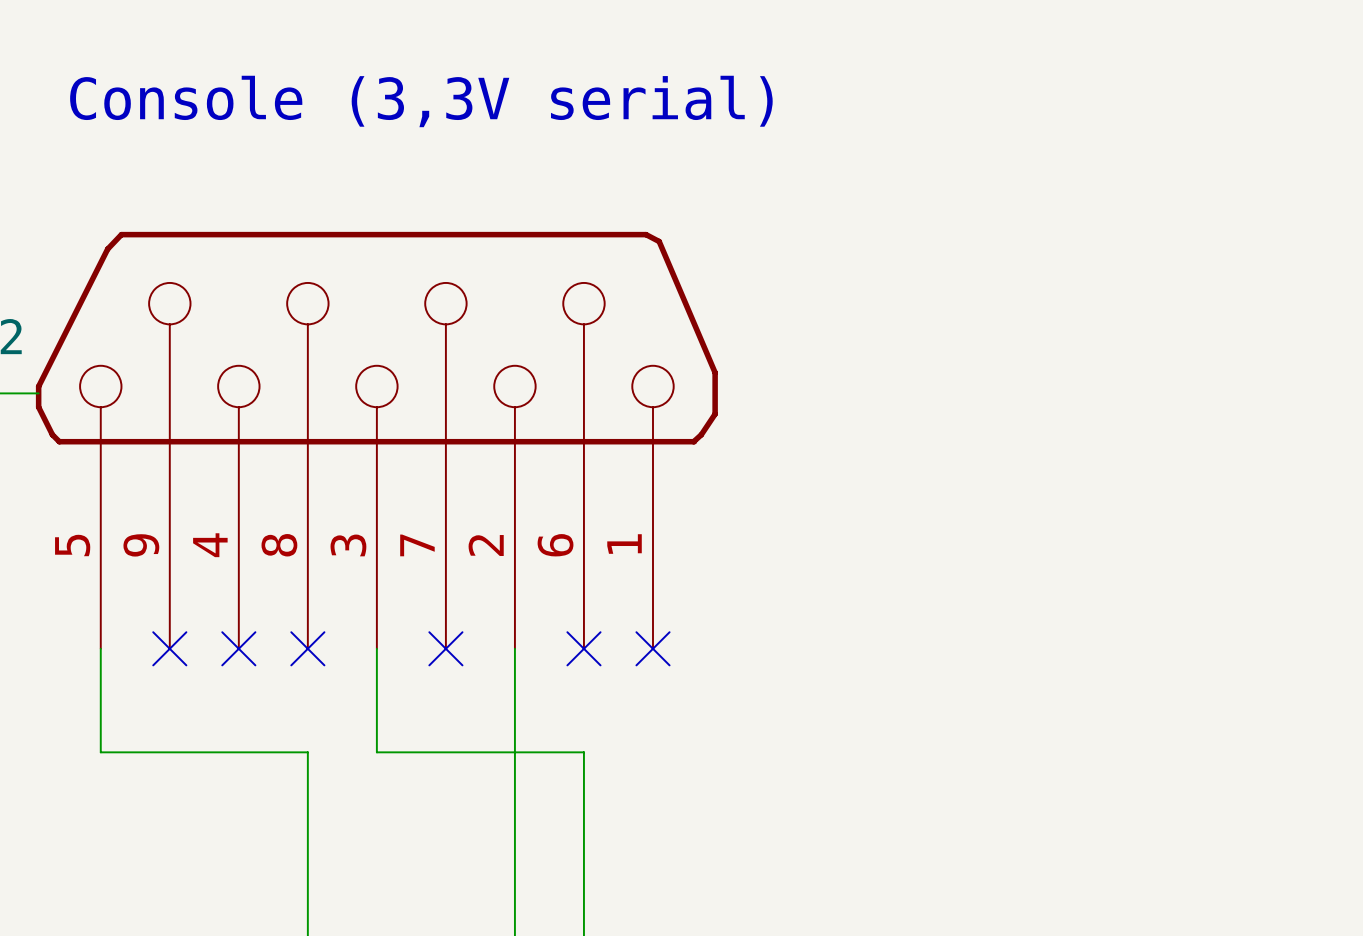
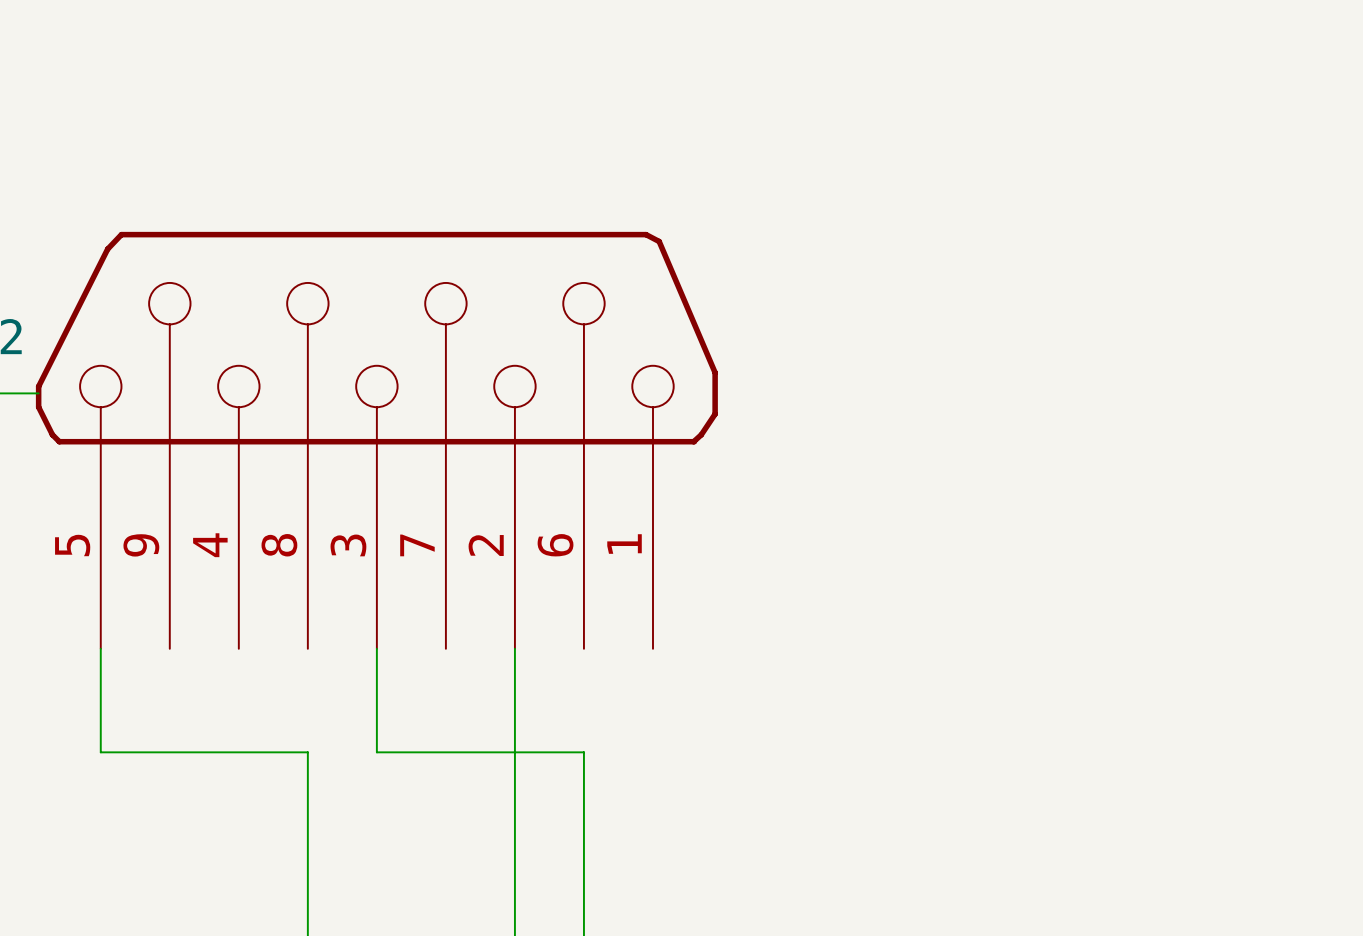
text: Console (3,3V serial) (421, 101) -> none
no-connect mark: (169, 648) -> none
no-connect mark: (238, 648) -> none
no-connect mark: (307, 648) -> none
no-connect mark: (445, 648) -> none
no-connect mark: (583, 648) -> none
no-connect mark: (652, 648) -> none

